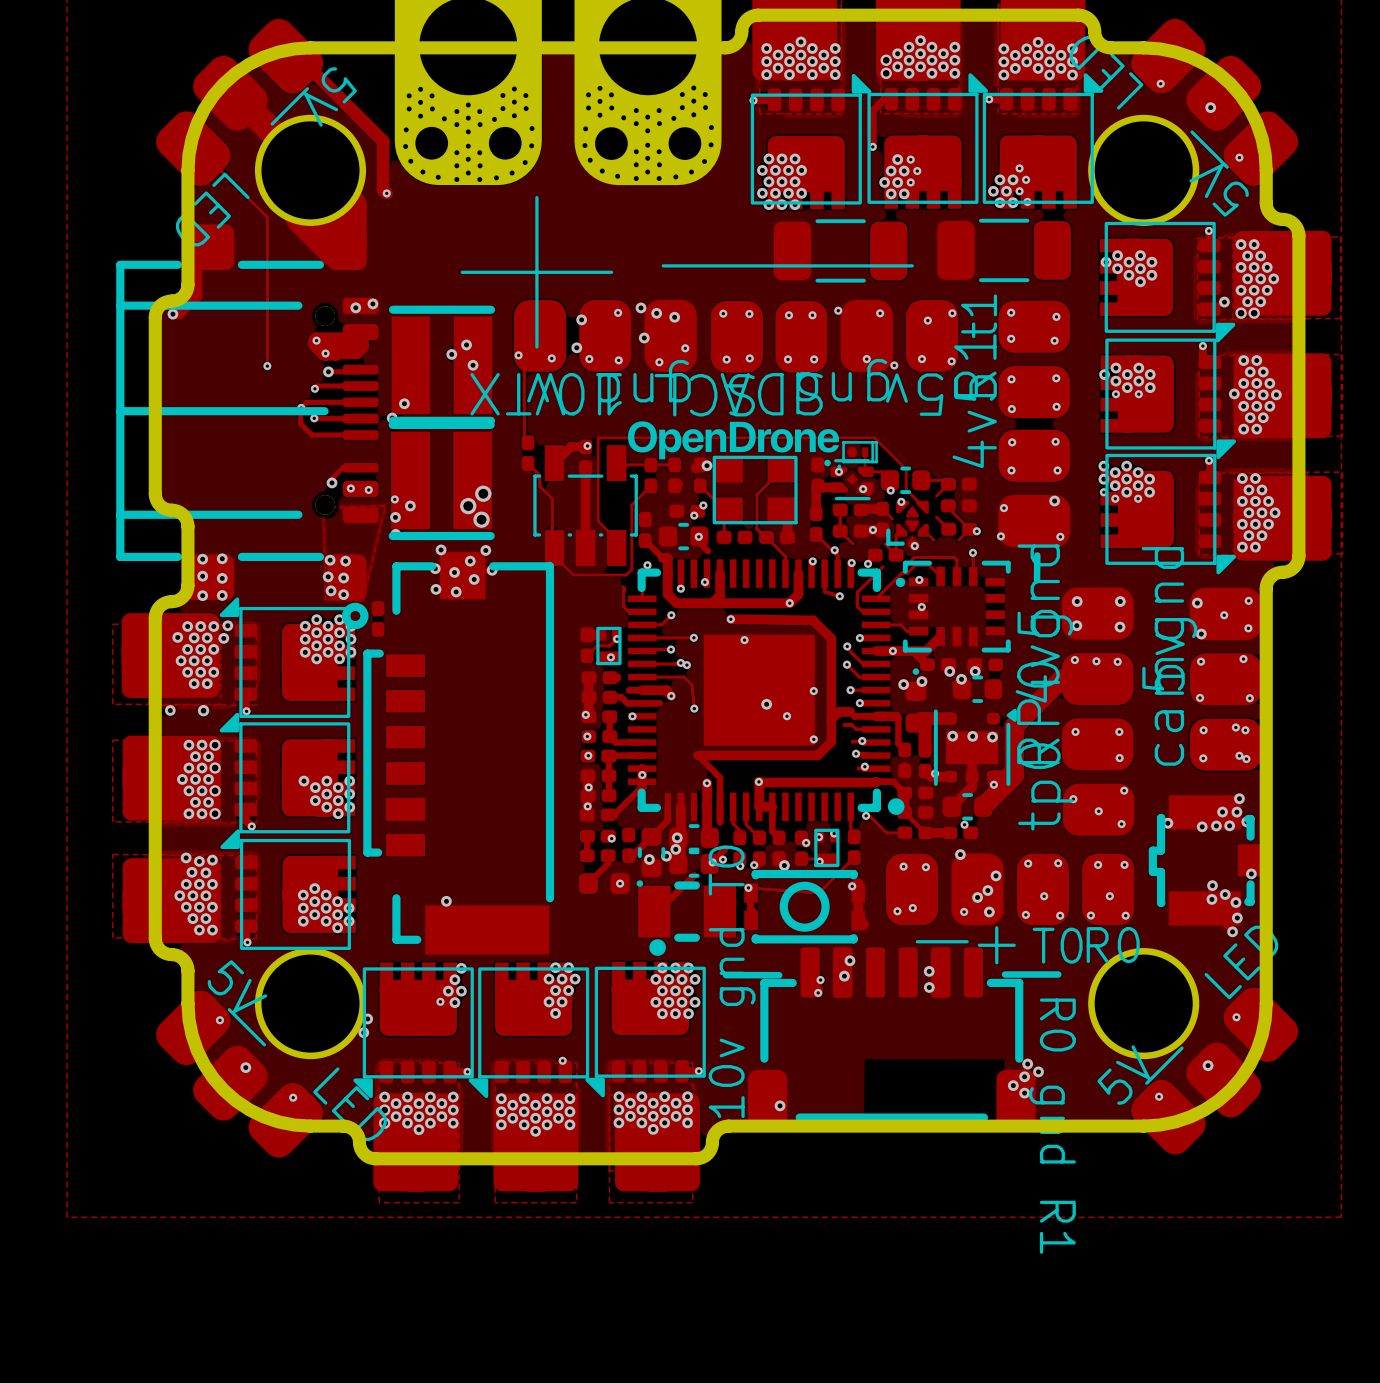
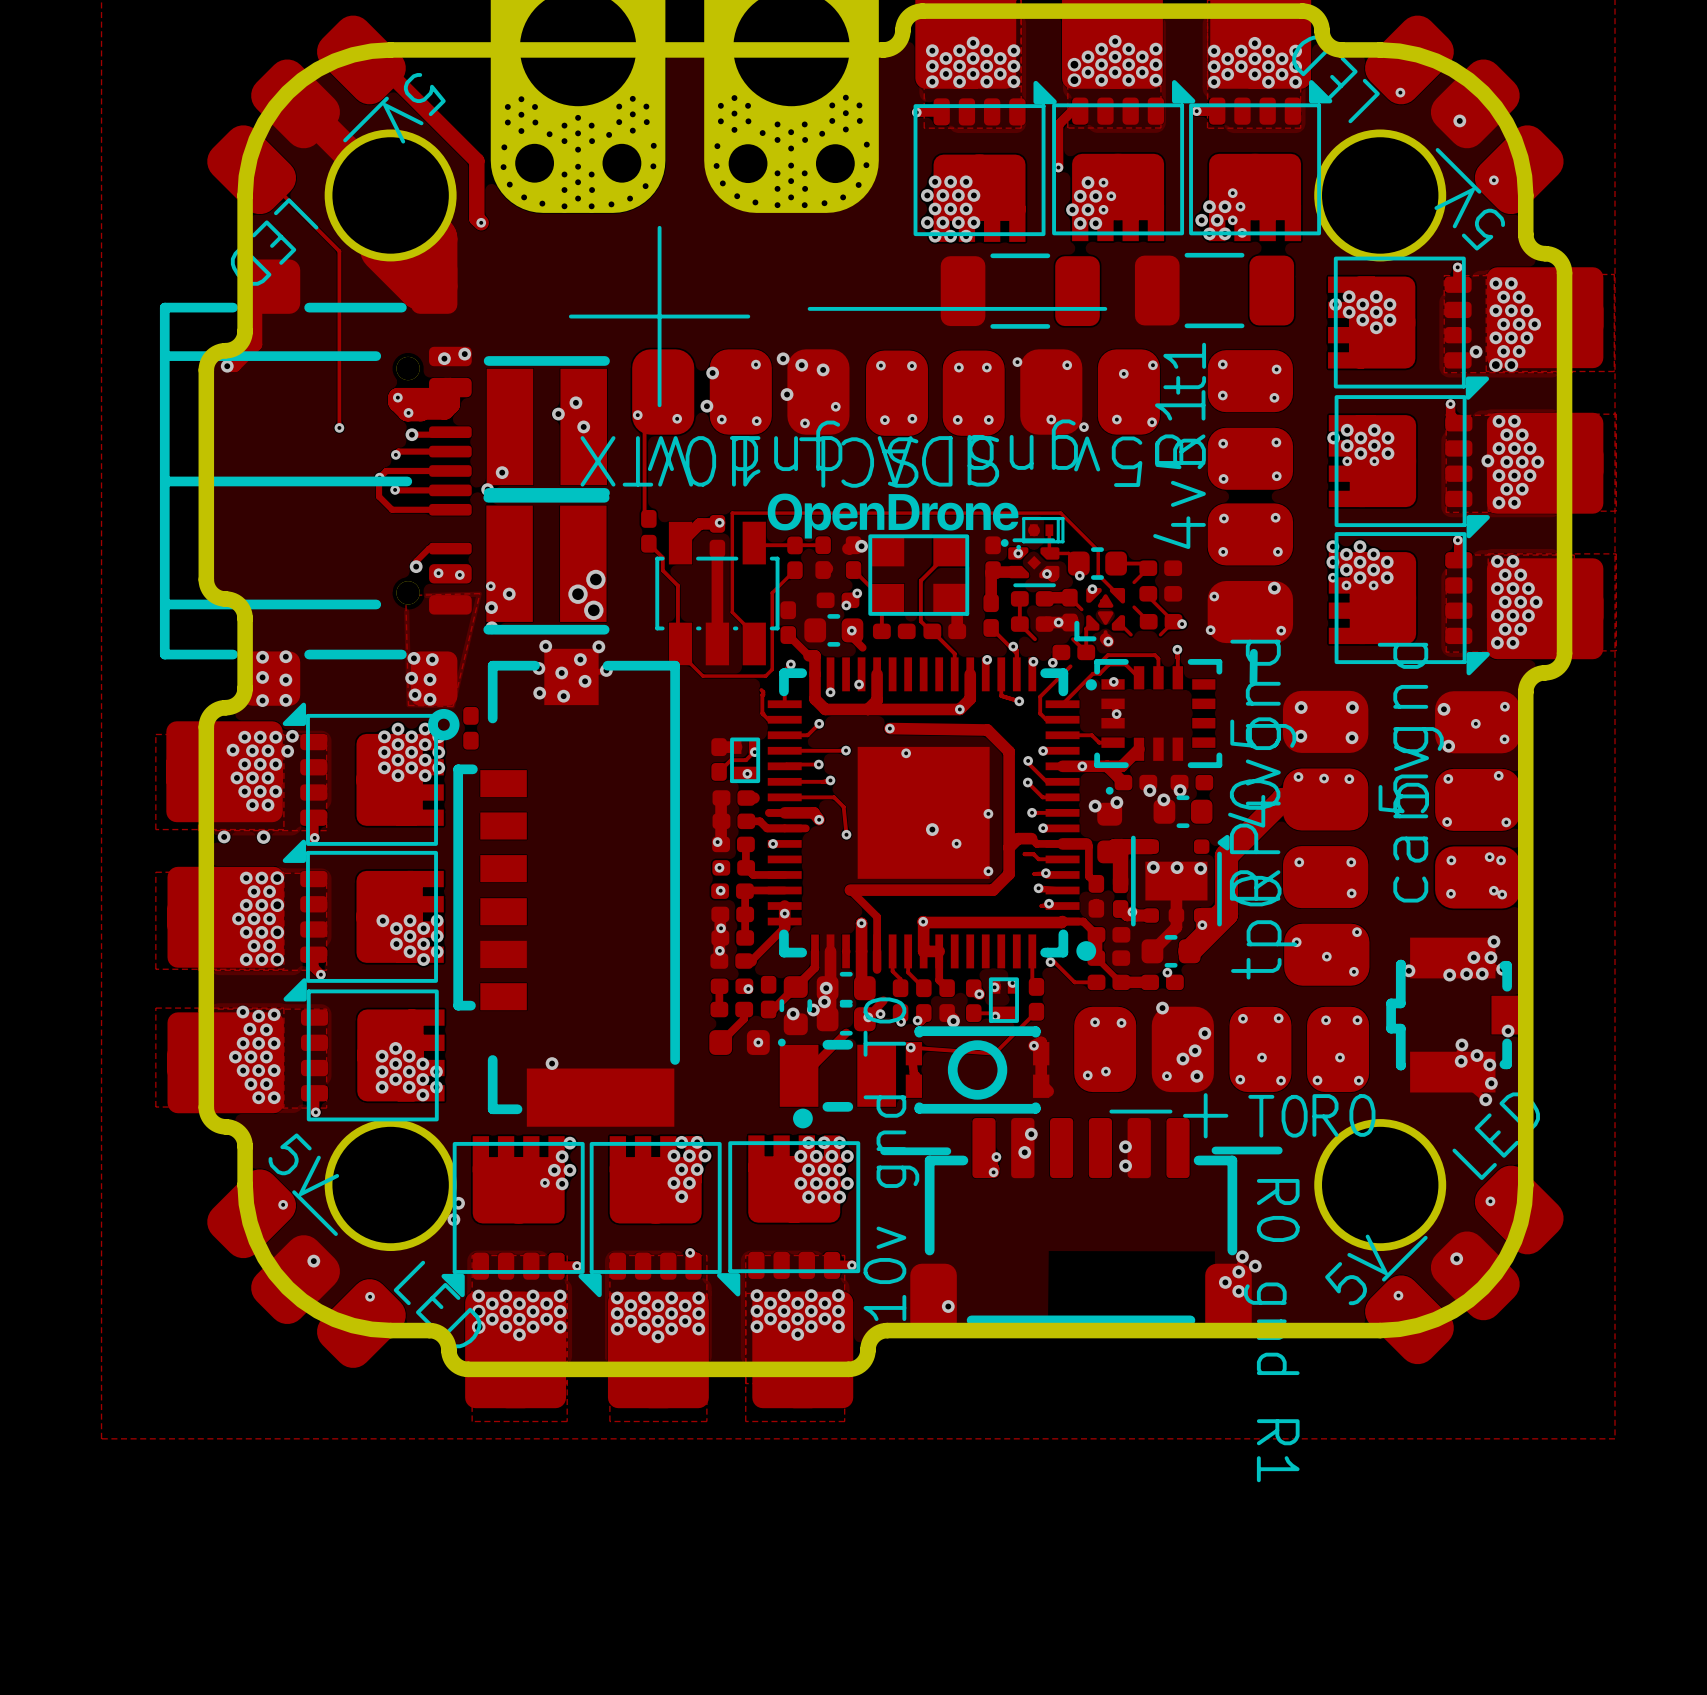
via: (686, 665) -> none

